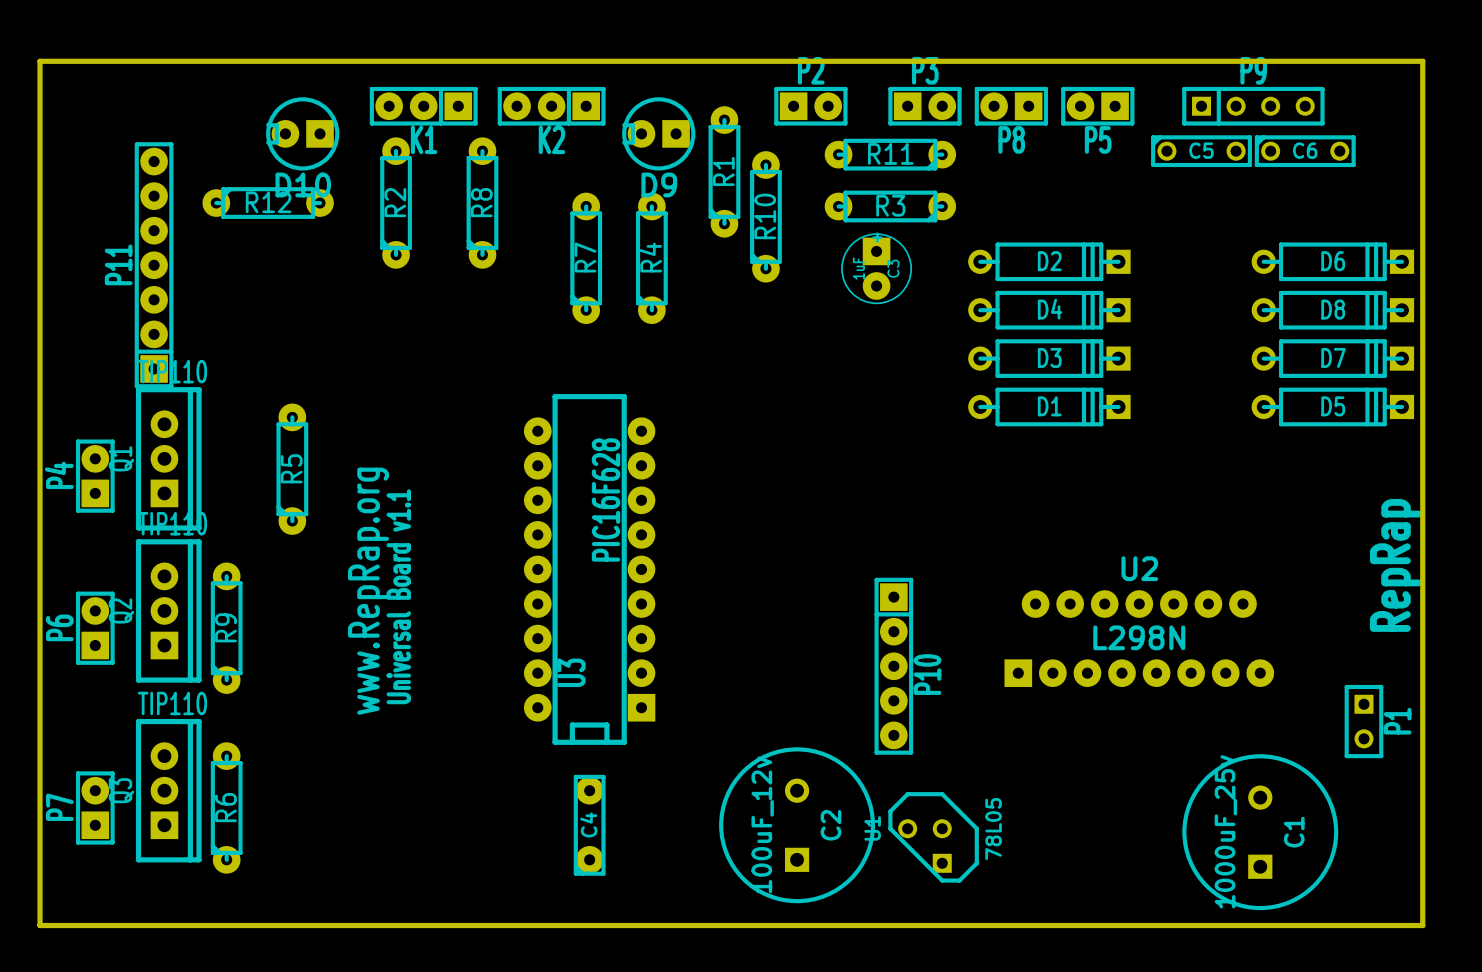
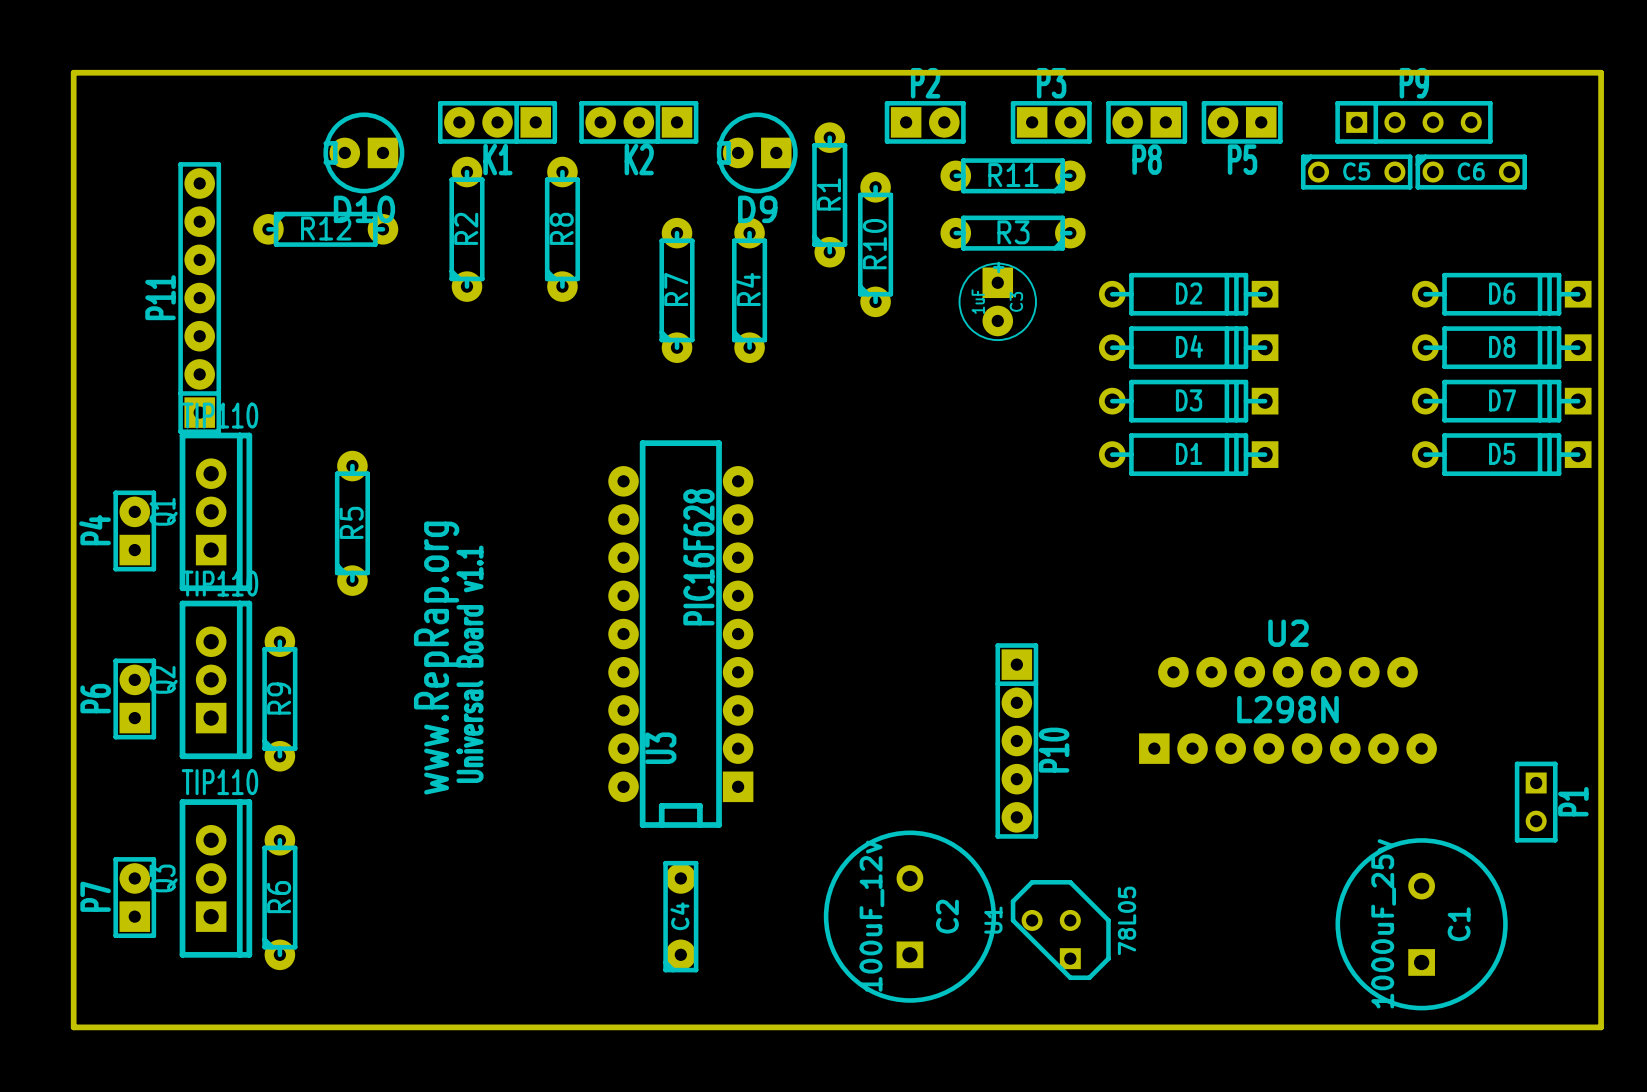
text: RepRap (1396, 565) -> none

